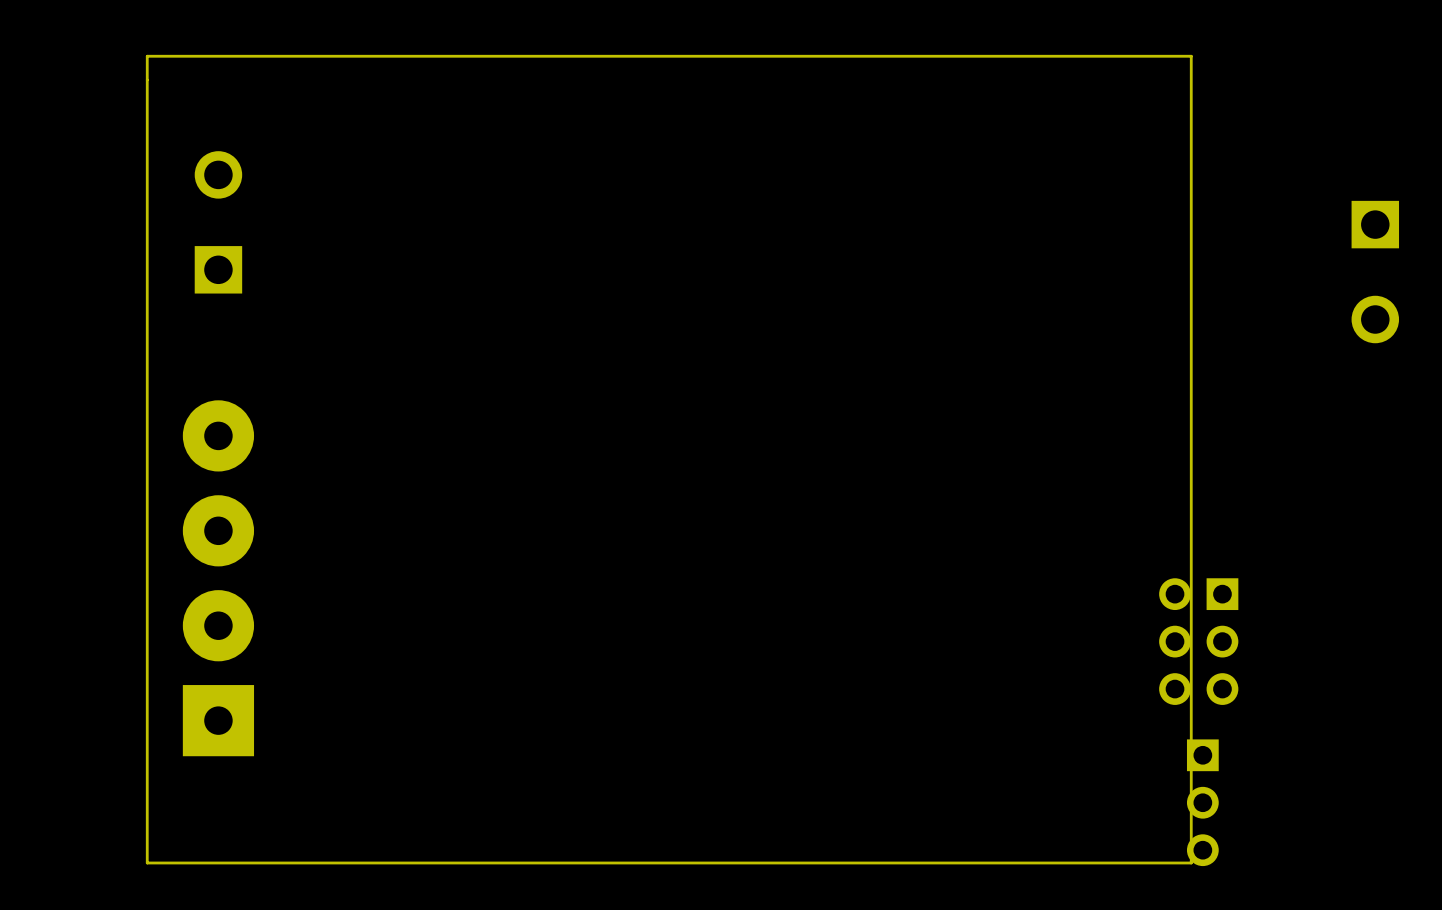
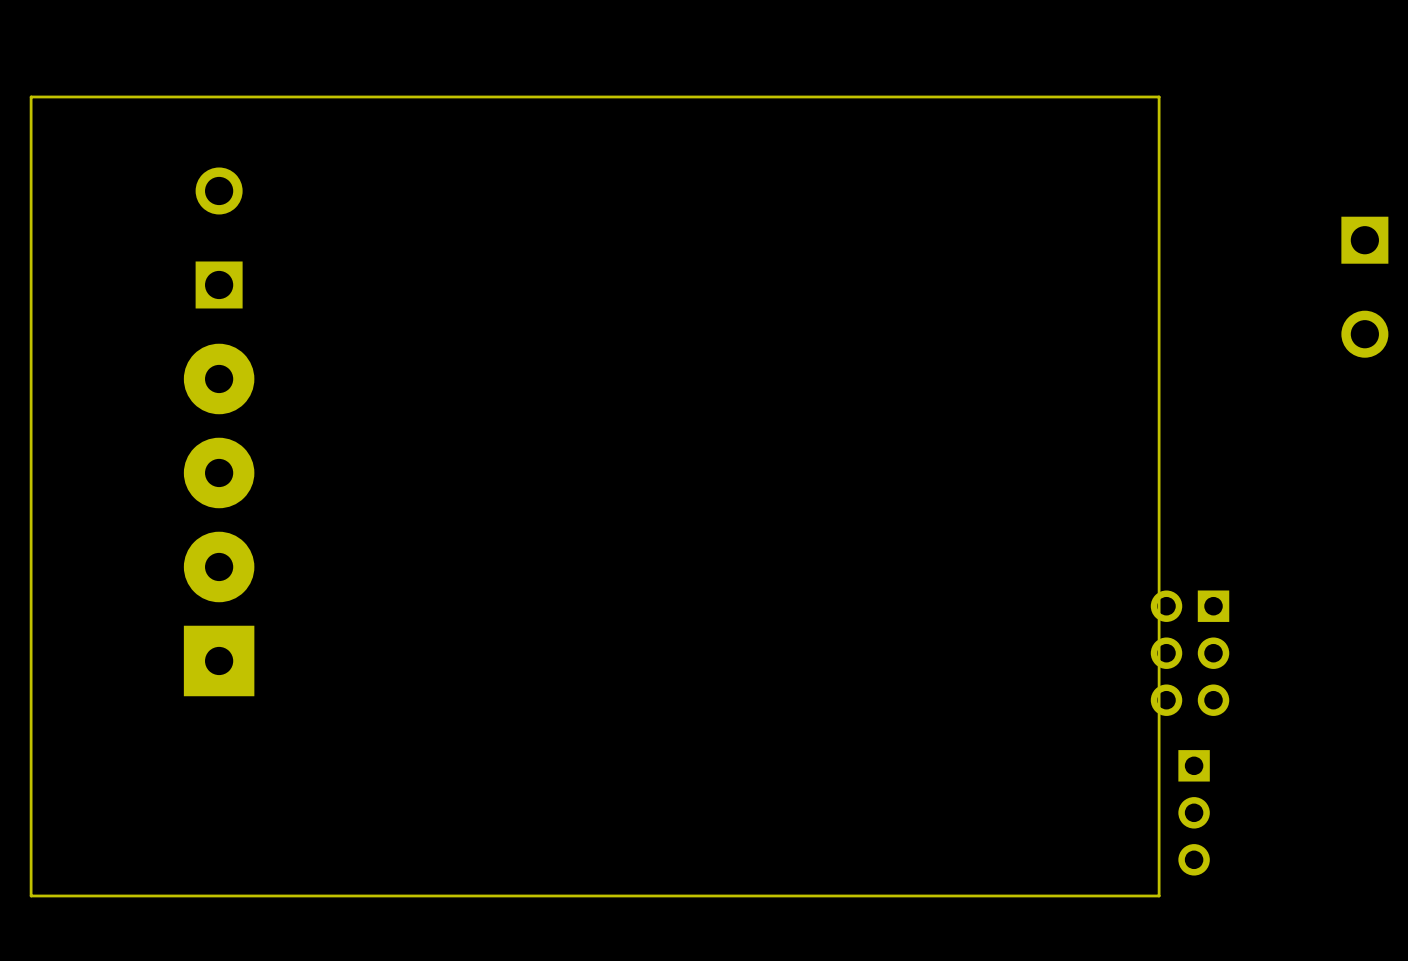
board edge: (1191, 56) (147, 56) (147, 862) (1191, 862) (1191, 56) -> (1159, 96) (1159, 895) (31, 895) (31, 96) (1159, 96)
part position: (218, 578) -> (219, 519)

